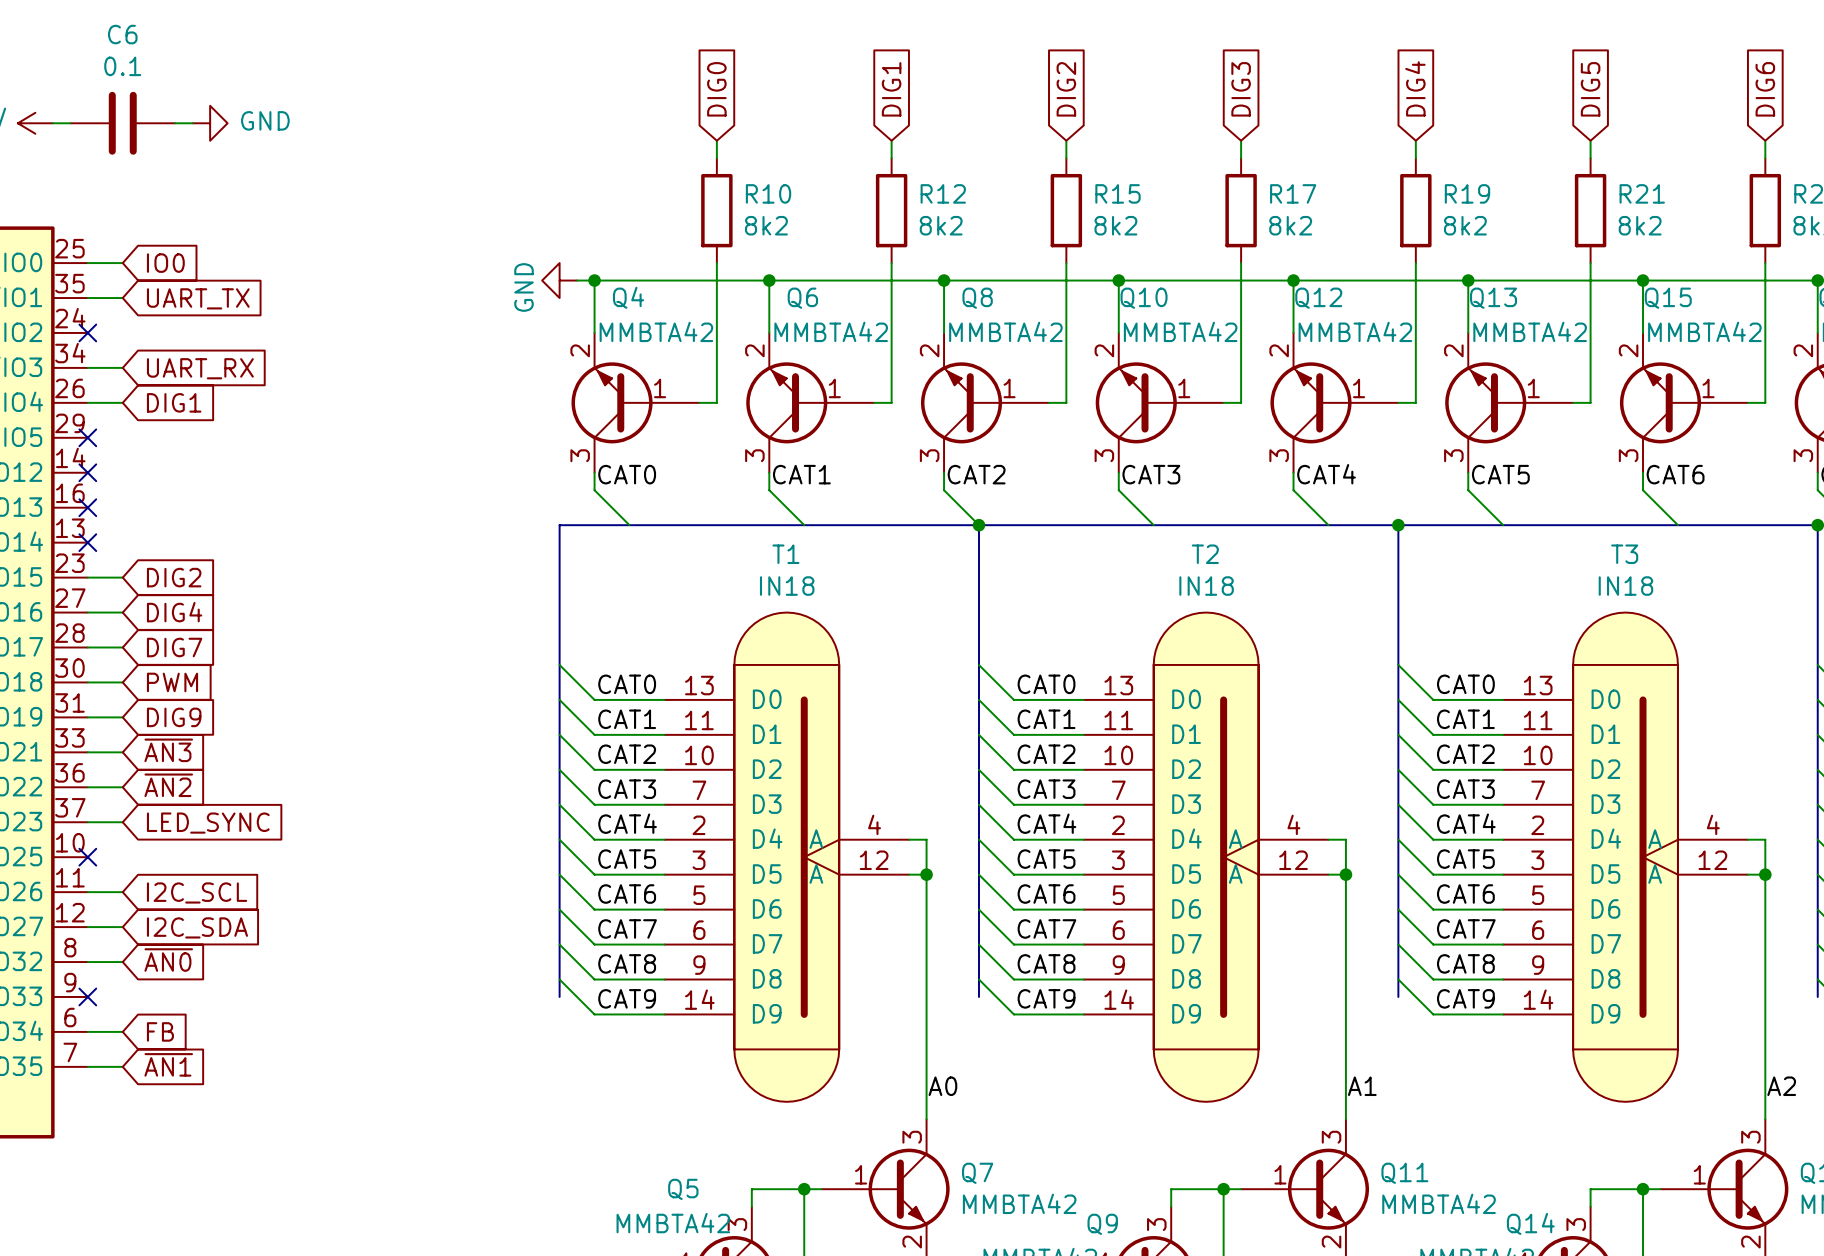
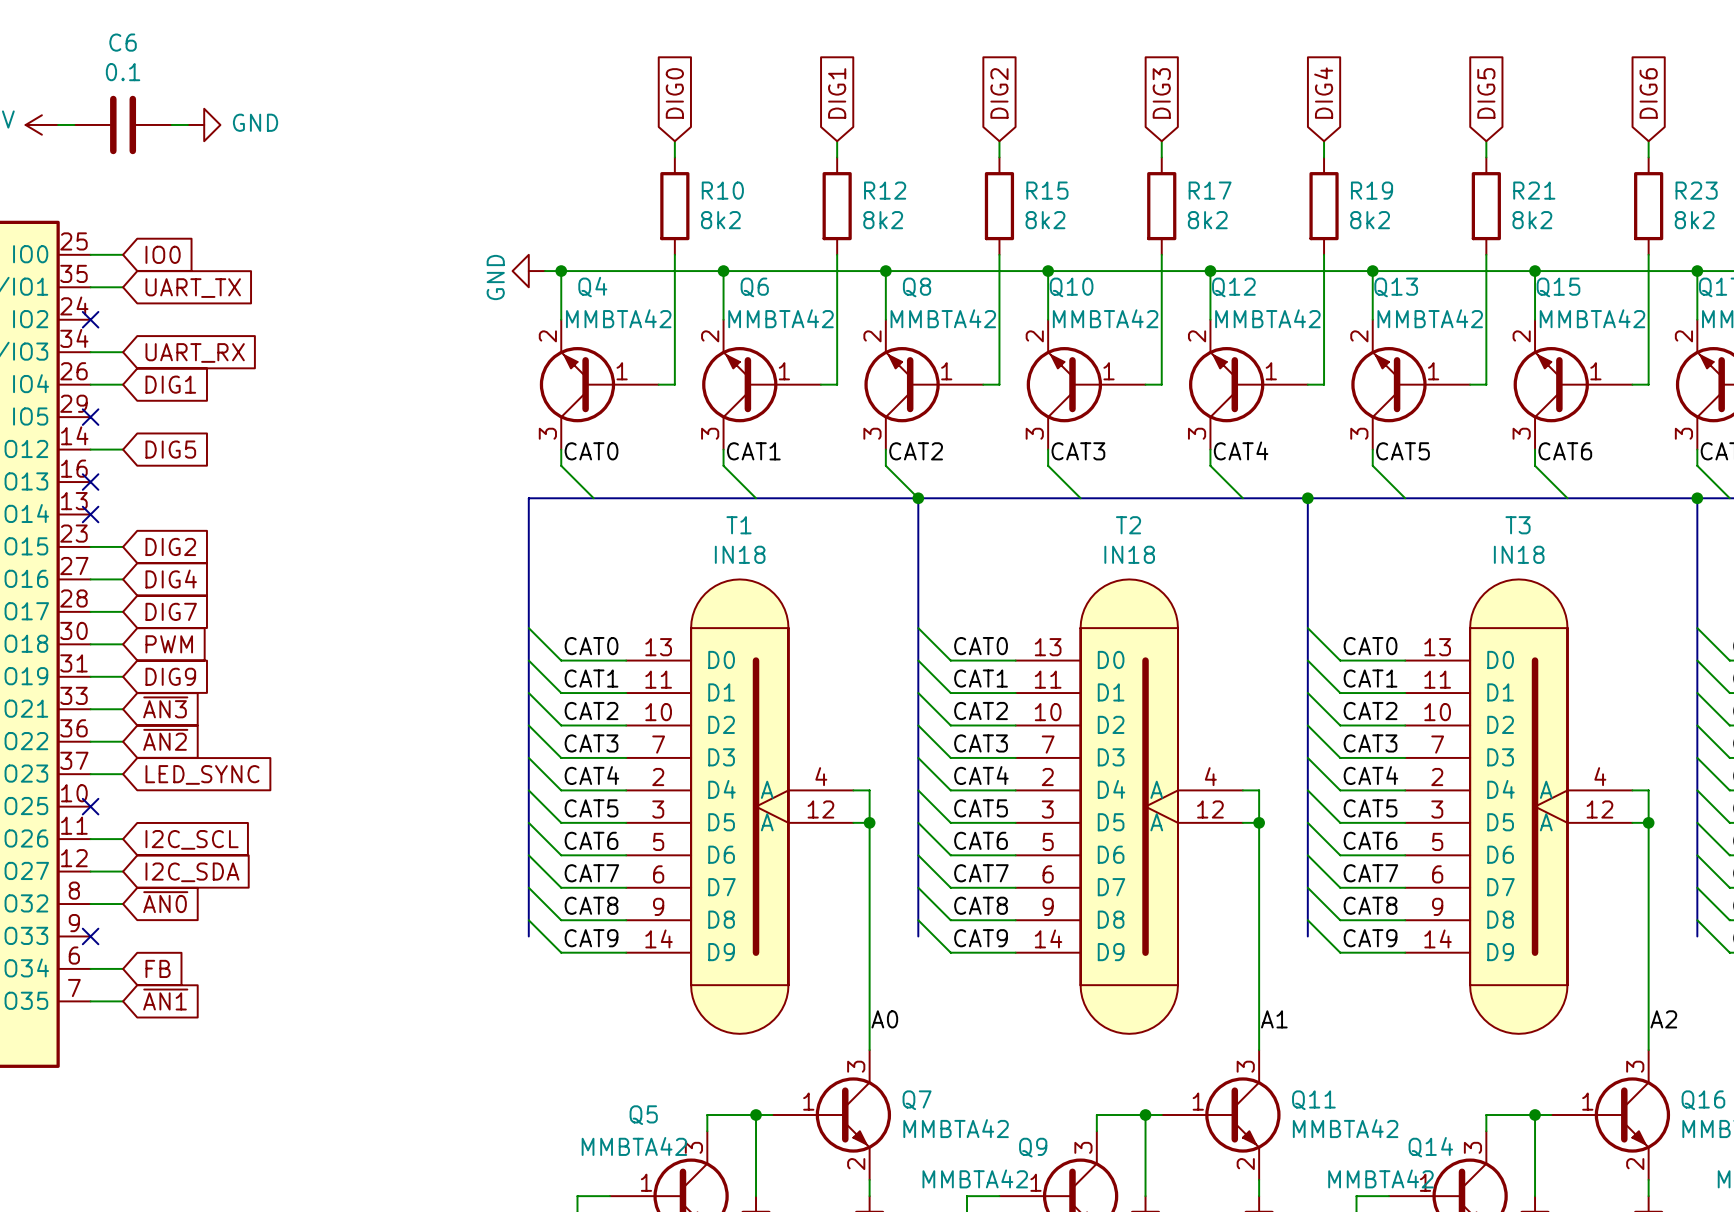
wire: none -> (90, 449) (123, 449)
no-connect mark: (87, 472) -> none
global label: none -> DIG5 (170, 449)

